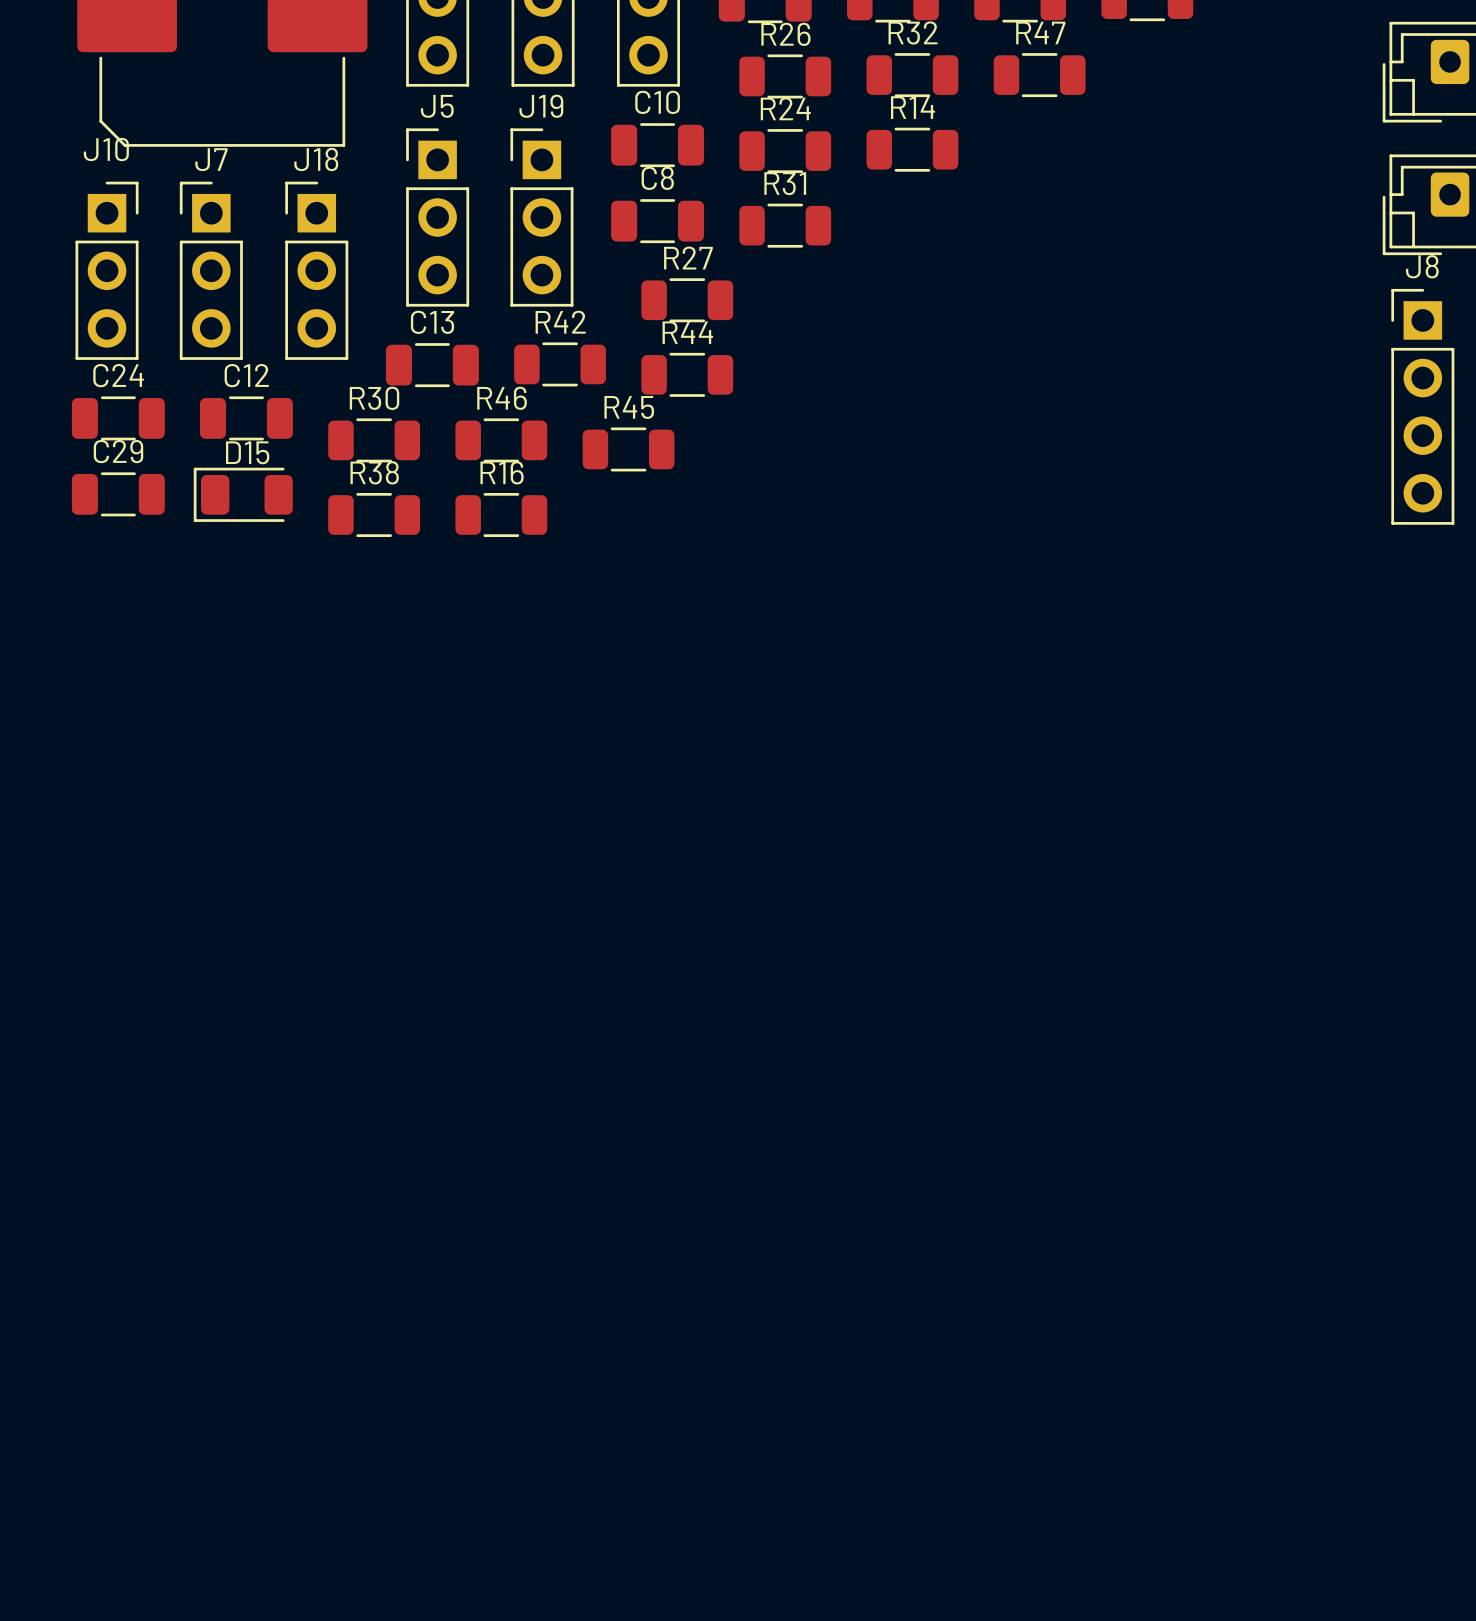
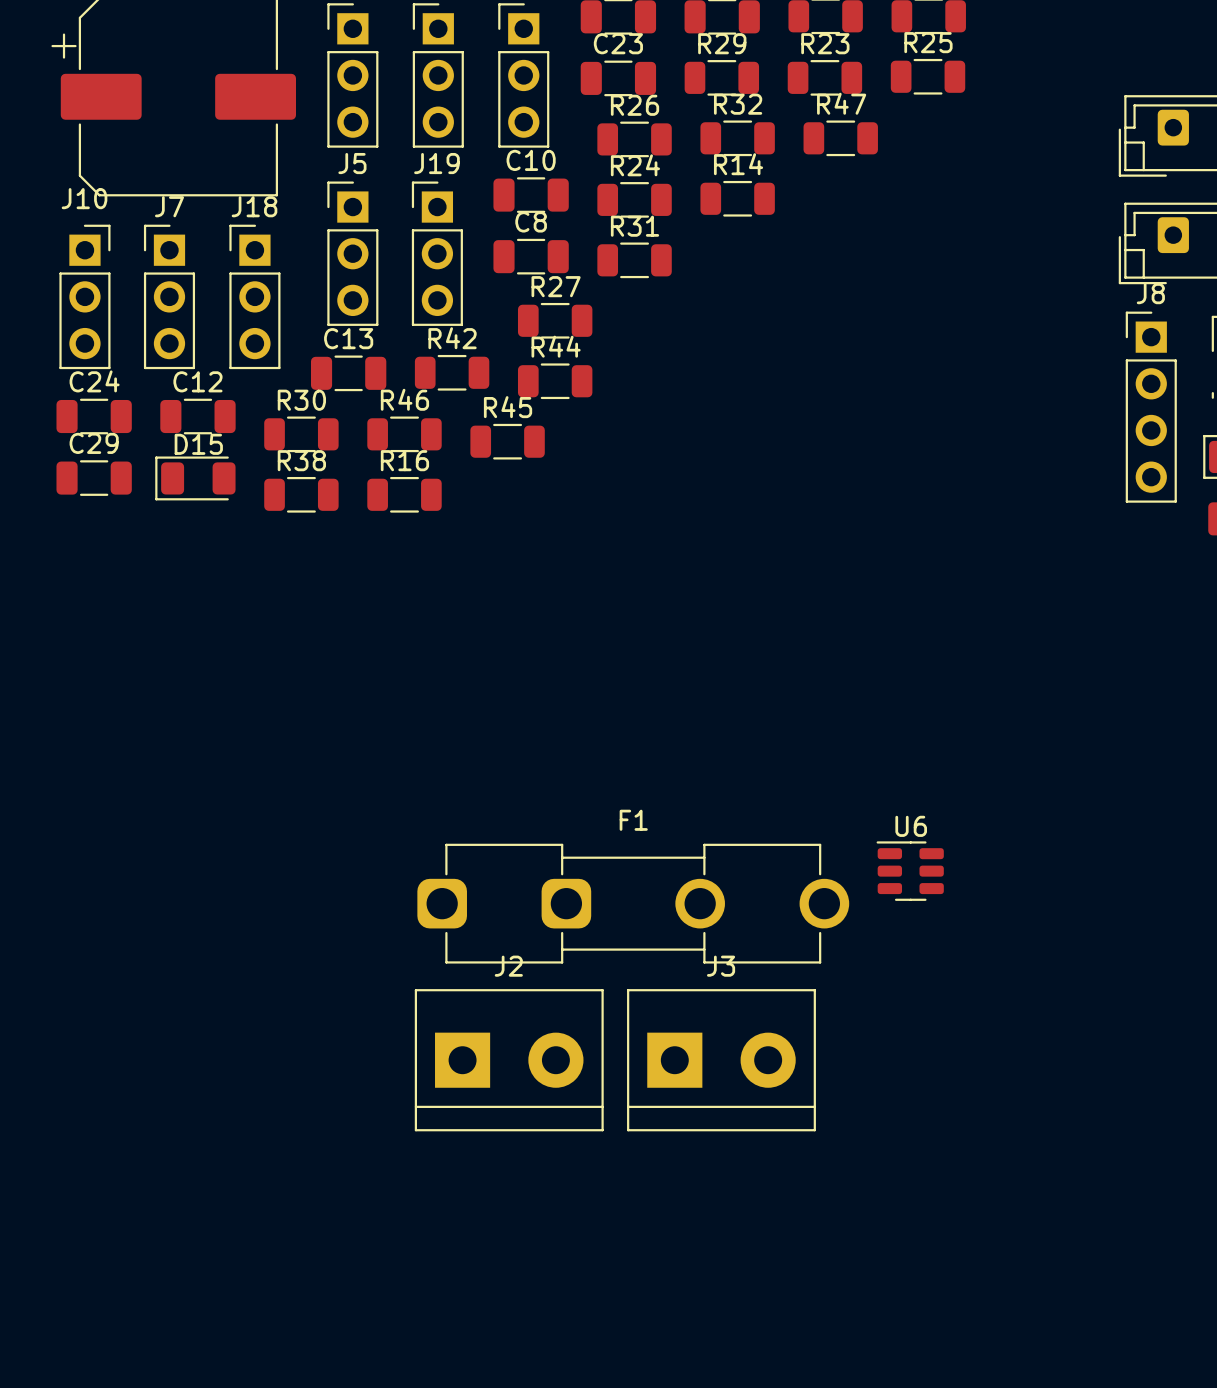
U6: none -> (910, 871)
F1: none -> (633, 903)
J2: none -> (509, 1060)
J3: none -> (721, 1060)

